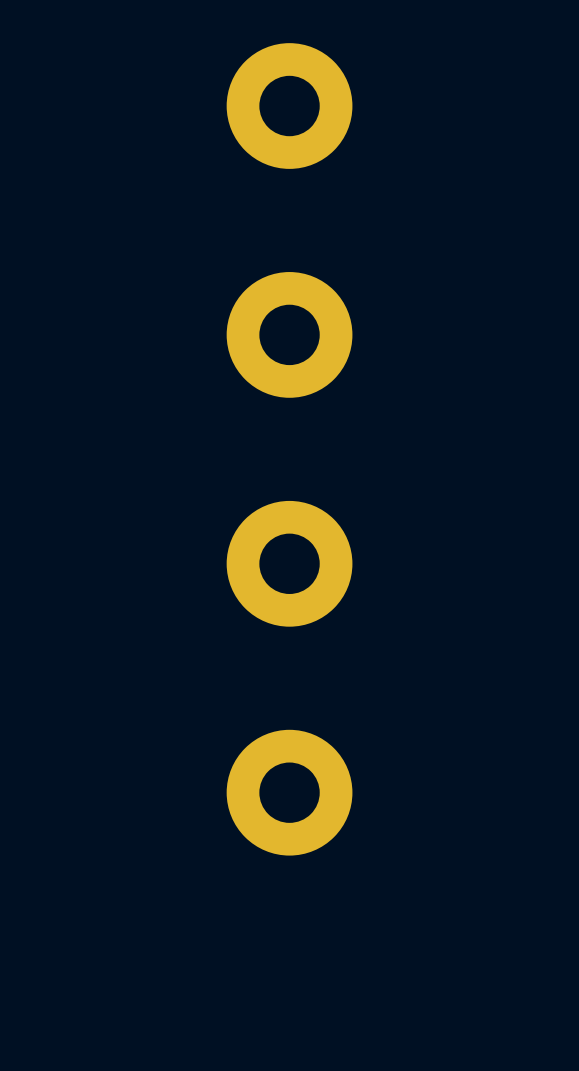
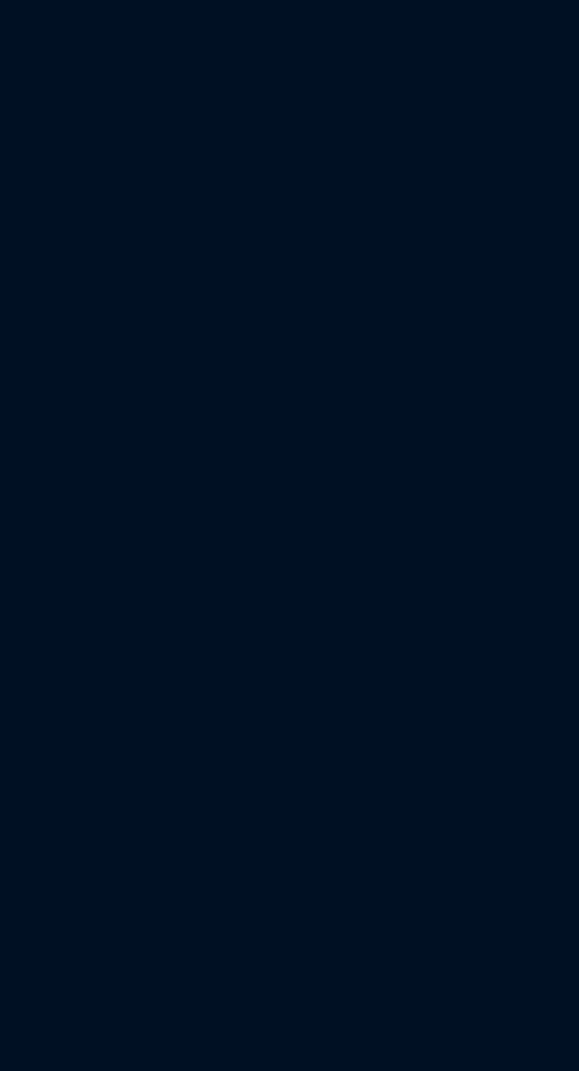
part: (289, 106) -> none
part: (289, 334) -> none
part: (289, 563) -> none
part: (289, 792) -> none

